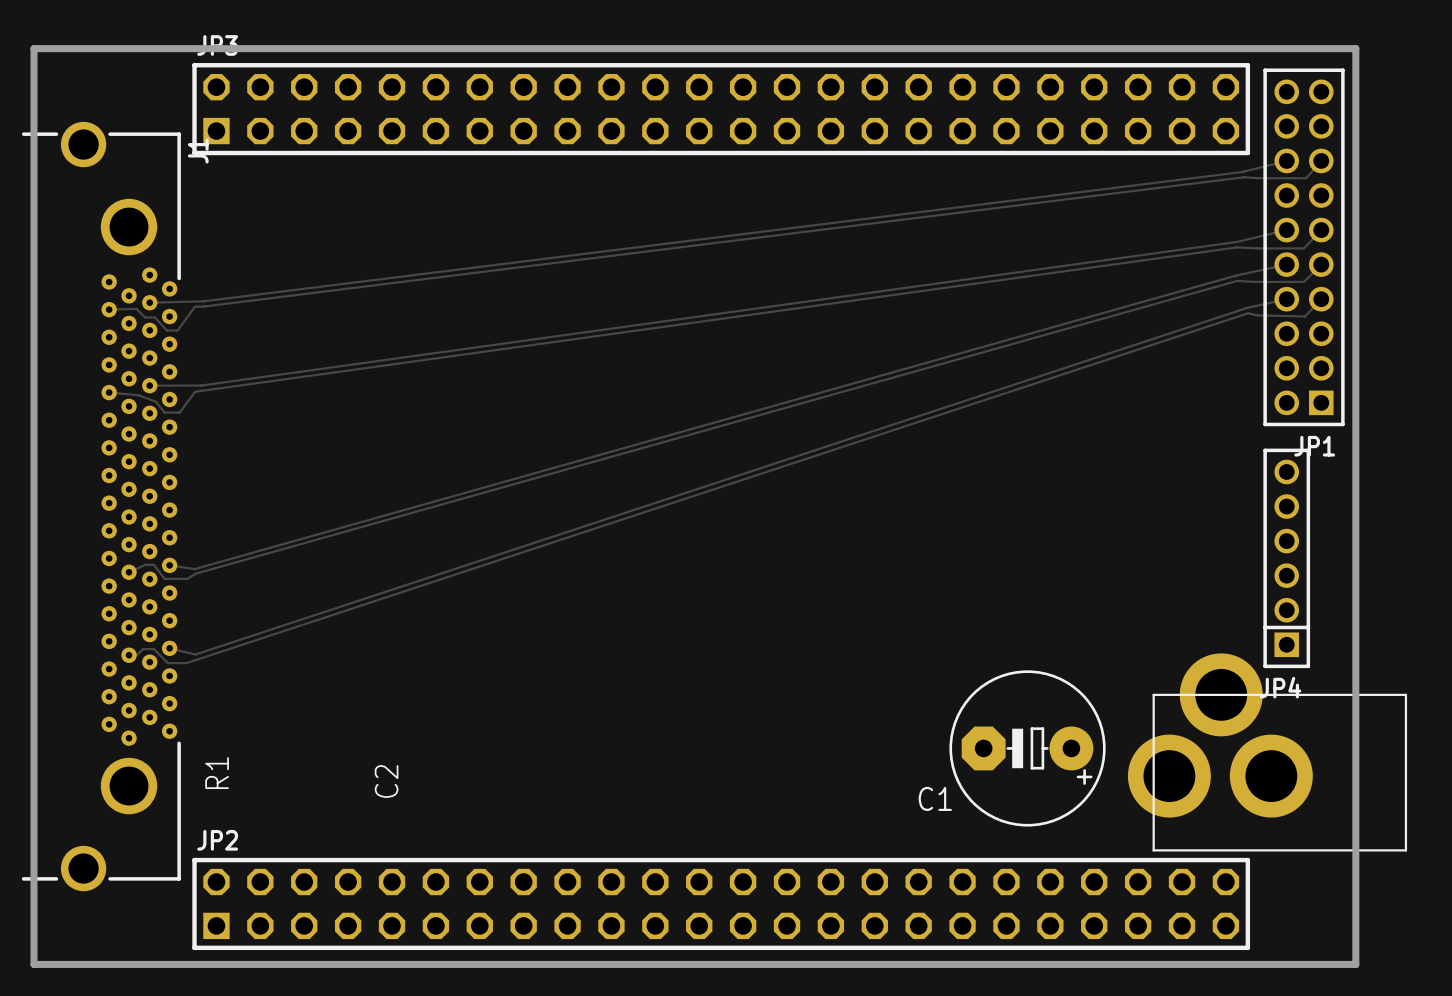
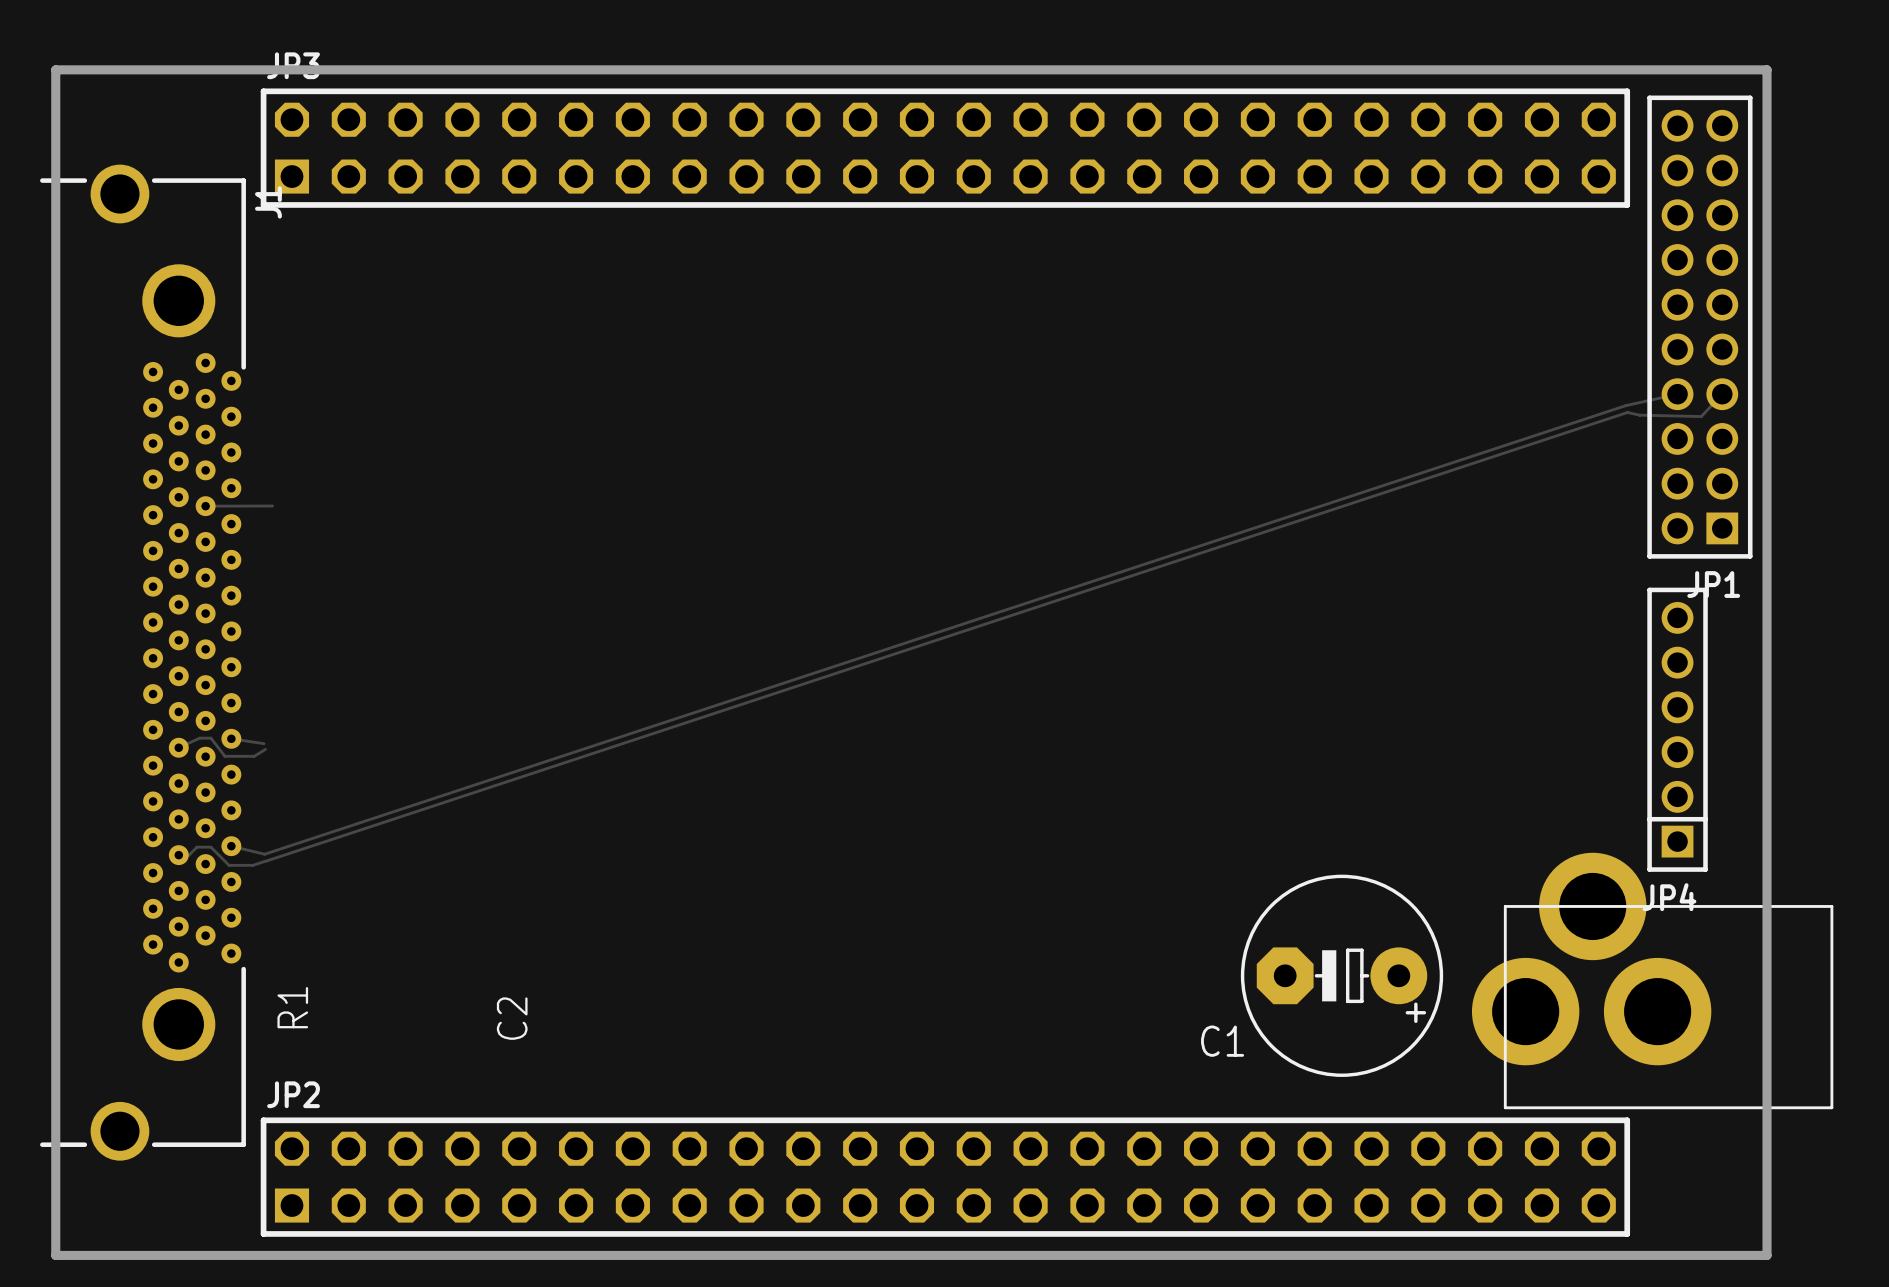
track: (1286, 160) (1243, 171) -> none
track: (1321, 160) (1306, 178) (1243, 177) -> none
track: (1244, 171) (203, 301) (149, 302) -> none
track: (1244, 177) (194, 306) (177, 330) (166, 330) (154, 317) (145, 317) (136, 308) (109, 309) -> none
track: (1286, 230) (1237, 241) (201, 385) -> none
track: (1321, 230) (1304, 248) (1237, 247) (200, 391) -> none
track: (1286, 264) (1235, 275) (194, 569) -> none
track: (1321, 264) (1304, 281) (1237, 280) (196, 573) -> none
track: (201, 390) (194, 392) (179, 412) (164, 412) (156, 401) (138, 395) (109, 392) -> none

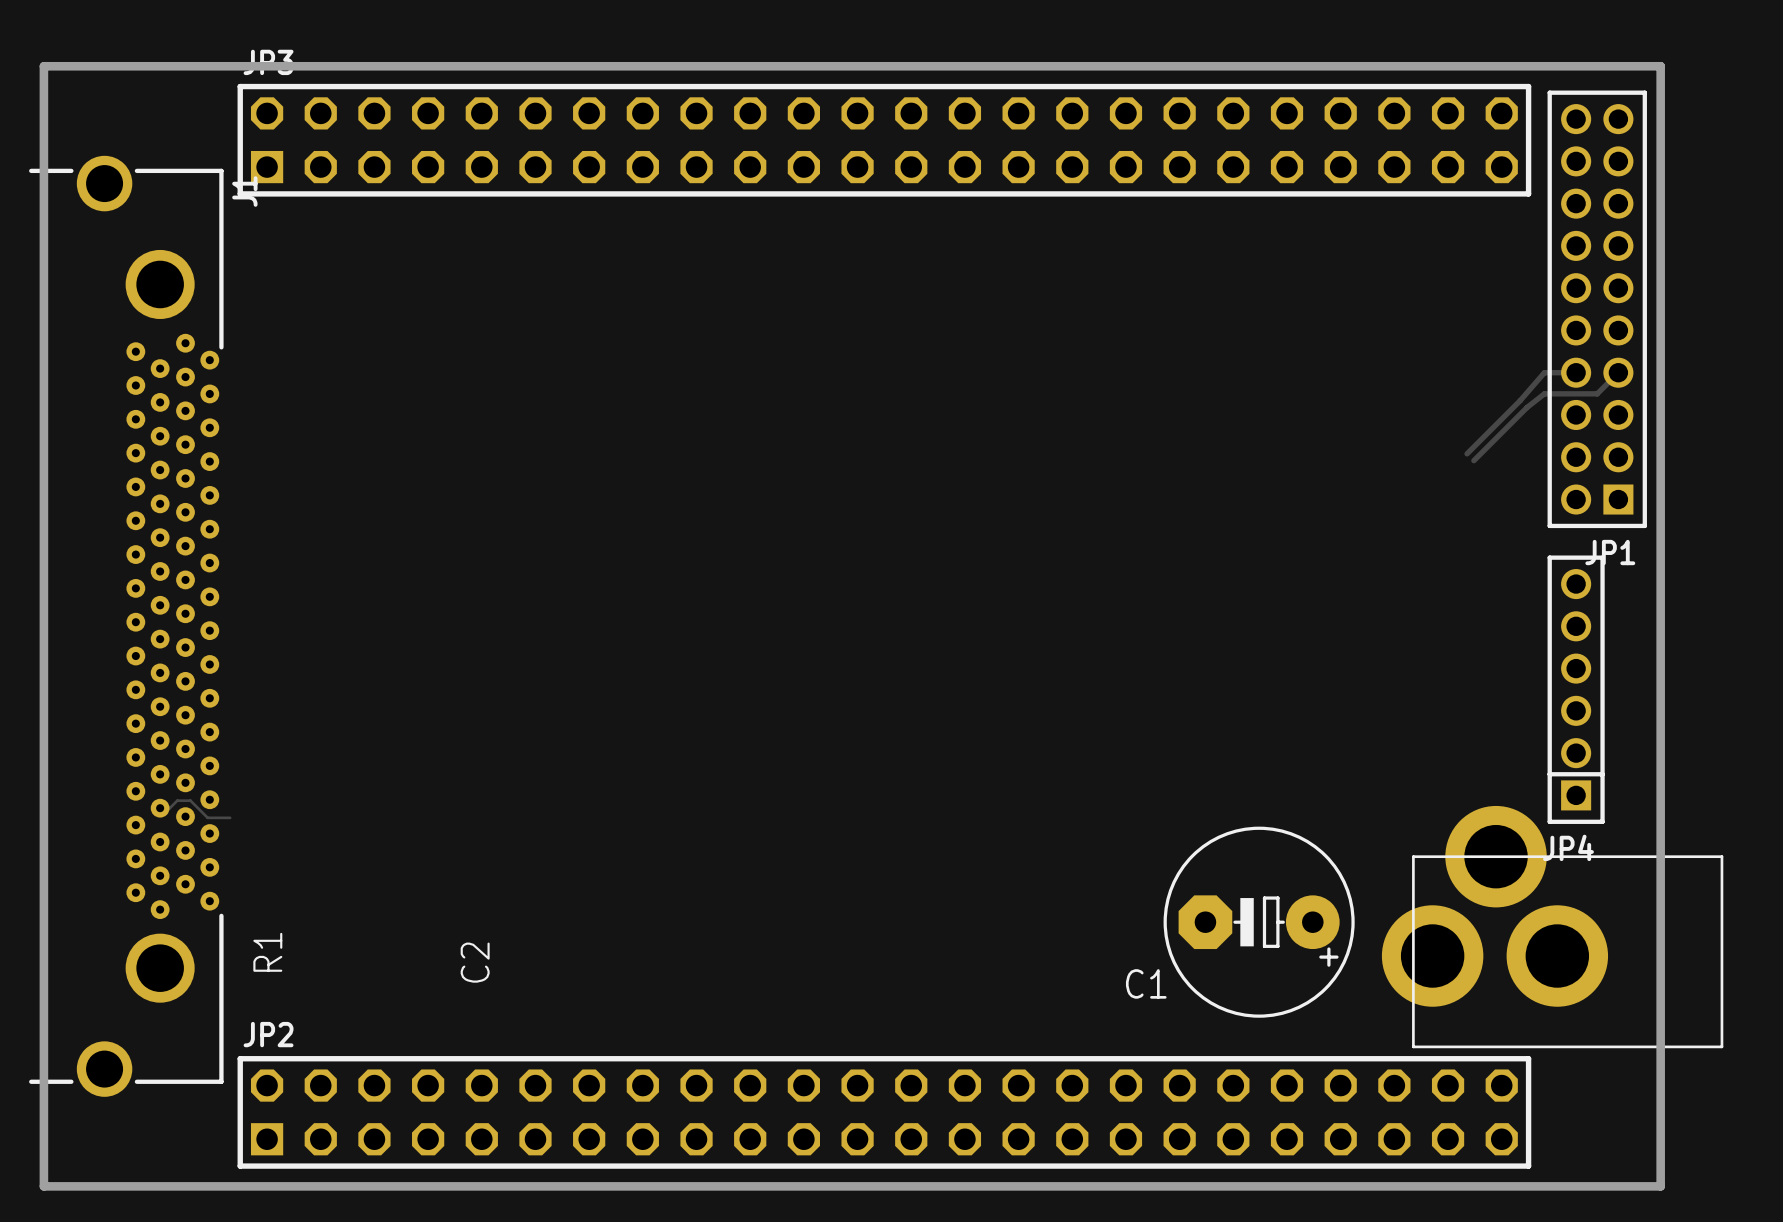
track: (1677, 394) (1625, 405) (264, 854) -> (1576, 372) (1544, 372) (1520, 400) (1467, 453)
track: (1722, 394) (1701, 416) (1639, 415) (1627, 412) (266, 861) -> (1618, 372) (1597, 393) (1544, 393) (1527, 407) (1473, 460)
track: (272, 506) (205, 506) -> none
track: (231, 738) (264, 743) -> none
track: (178, 747) (199, 738) (210, 738) (224, 756) (254, 756) (265, 749) -> none
track: (231, 846) (264, 854) -> none
track: (265, 861) (252, 865) -> none

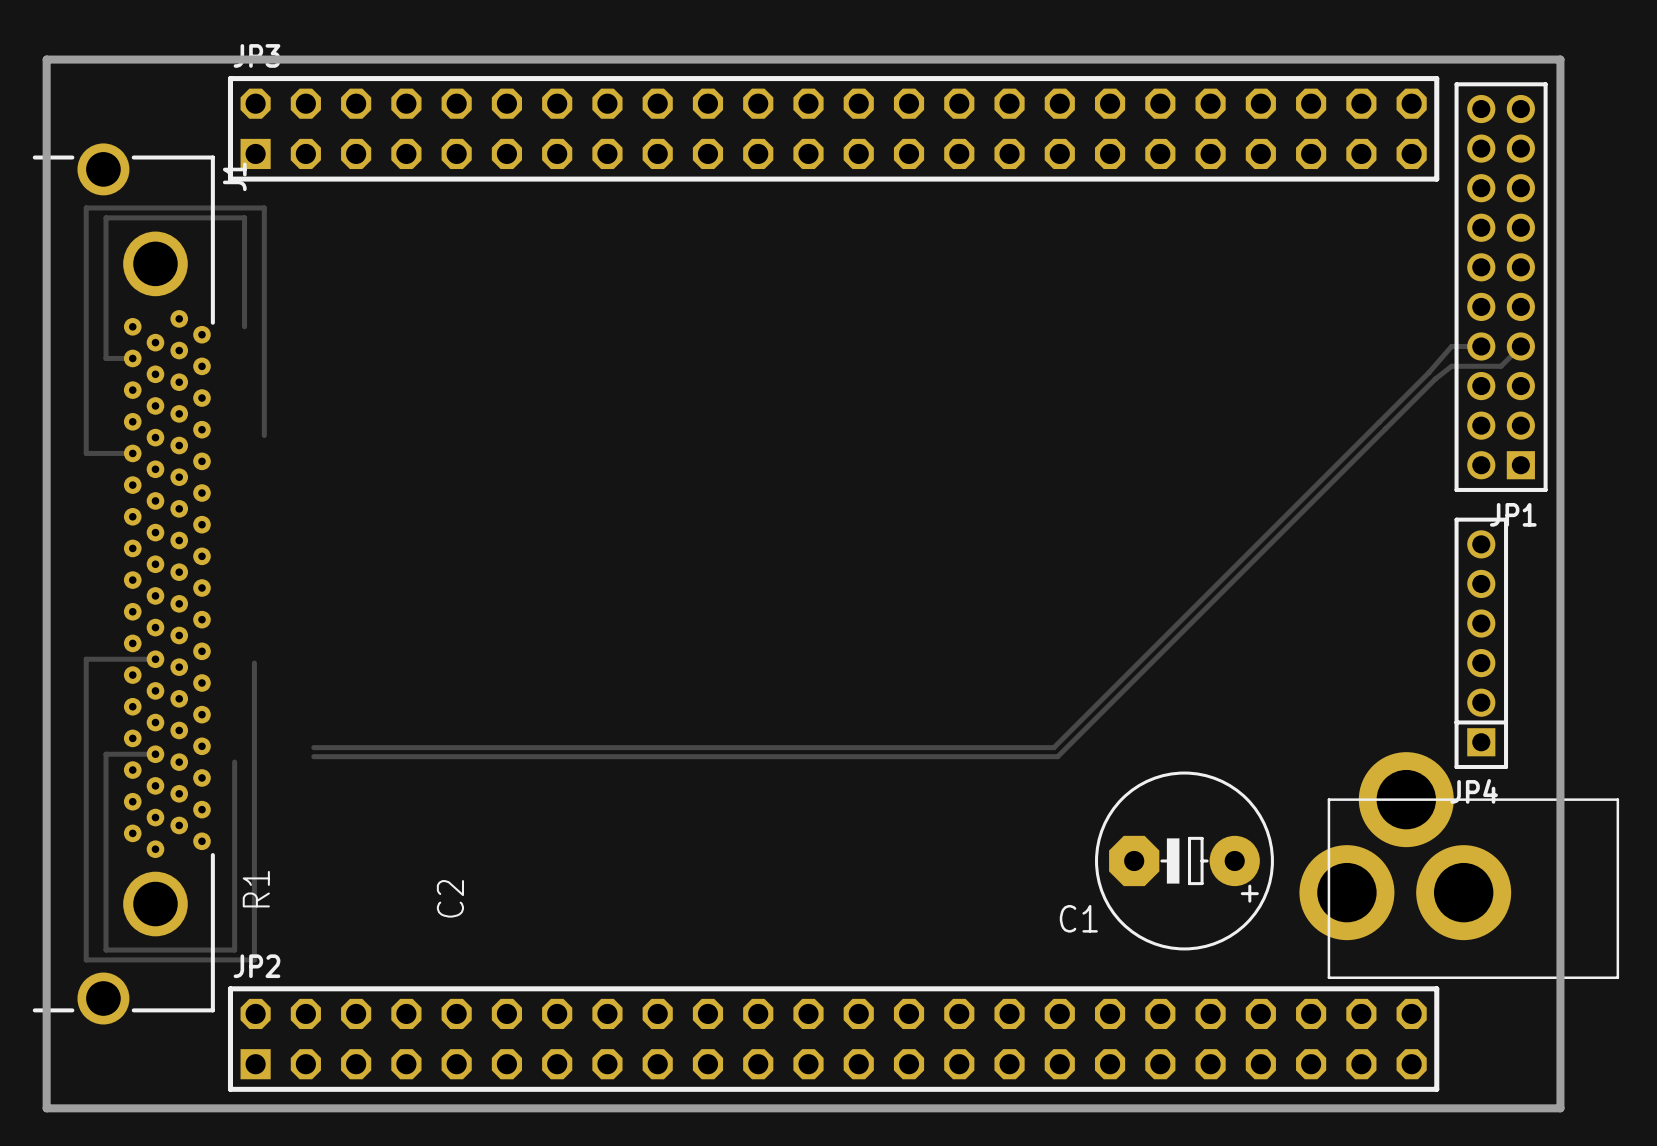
track: none -> (244, 326) (244, 217) (106, 217) (106, 358) (132, 358)
track: none -> (1379, 422) (1053, 747) (313, 747)
track: none -> (1385, 428) (1057, 756) (313, 756)
track: none -> (264, 435) (264, 207) (86, 207) (86, 453) (132, 453)
track: none -> (155, 659) (86, 659) (86, 959) (254, 959) (254, 663)
track: (160, 808) (169, 808) (177, 800) (190, 800) (207, 817) (230, 817) -> (155, 754) (106, 754) (106, 950) (234, 950) (234, 762)

